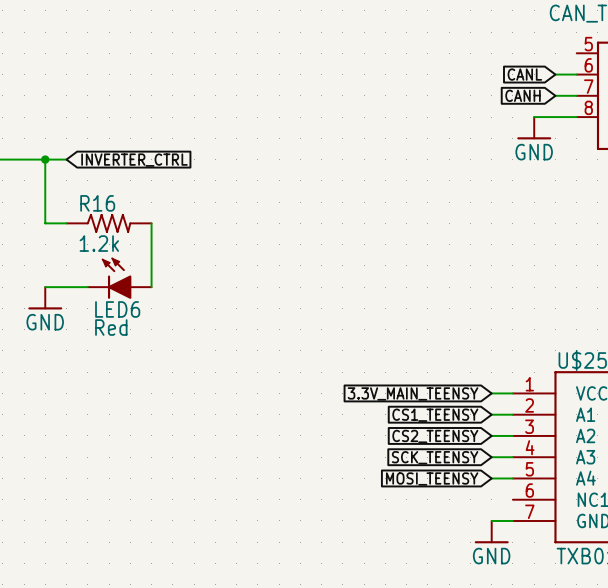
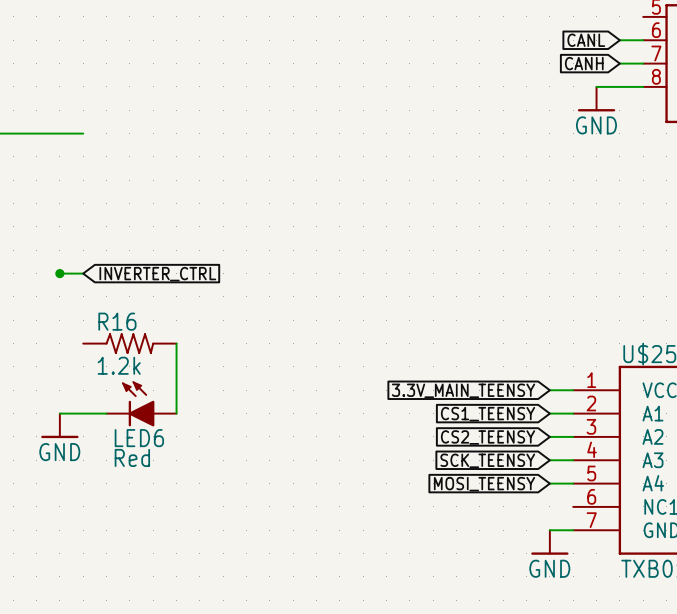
wire: (45, 159) (45, 223) (66, 223) -> none
junction: (45, 159) -> none
global label position: INVERTER_CTRL (134, 160) -> INVERTER_CTRL (157, 274)
R16 position: (109, 223) -> (129, 343)
wire: (151, 223) (151, 287) -> (176, 343) (176, 413)
LED6 position: (119, 278) -> (141, 403)
junction: none -> (59, 273)
wire: (66, 287) (87, 287) -> none
power symbol position: GND (45, 298) -> GND (59, 425)
wire: none -> (59, 413) (106, 413)

